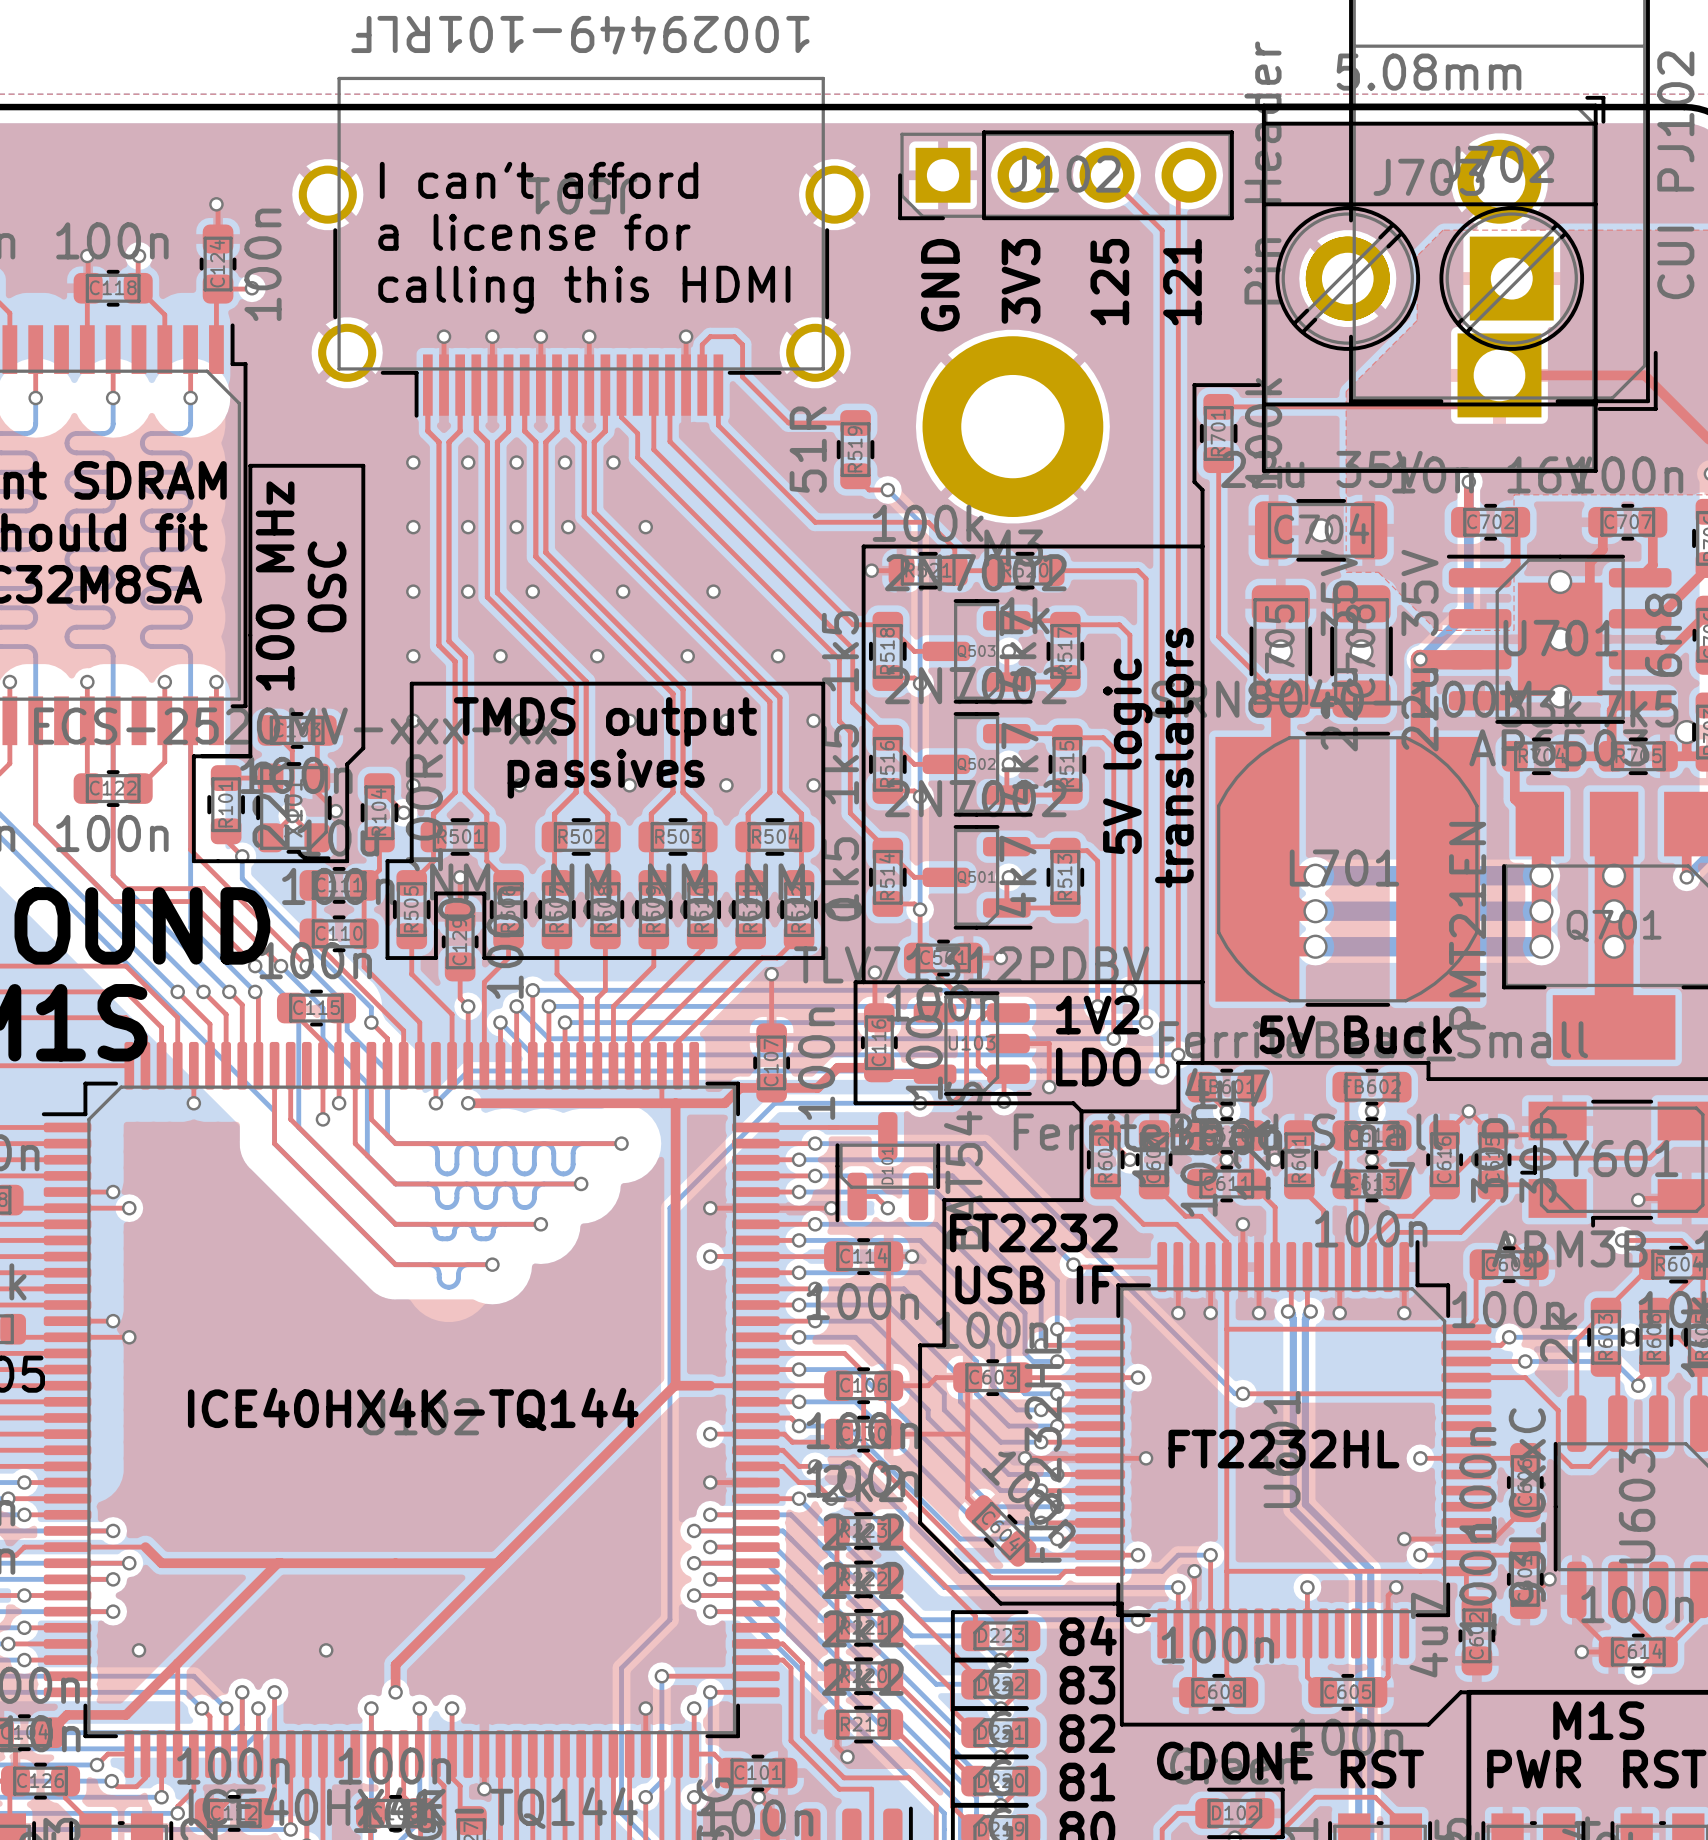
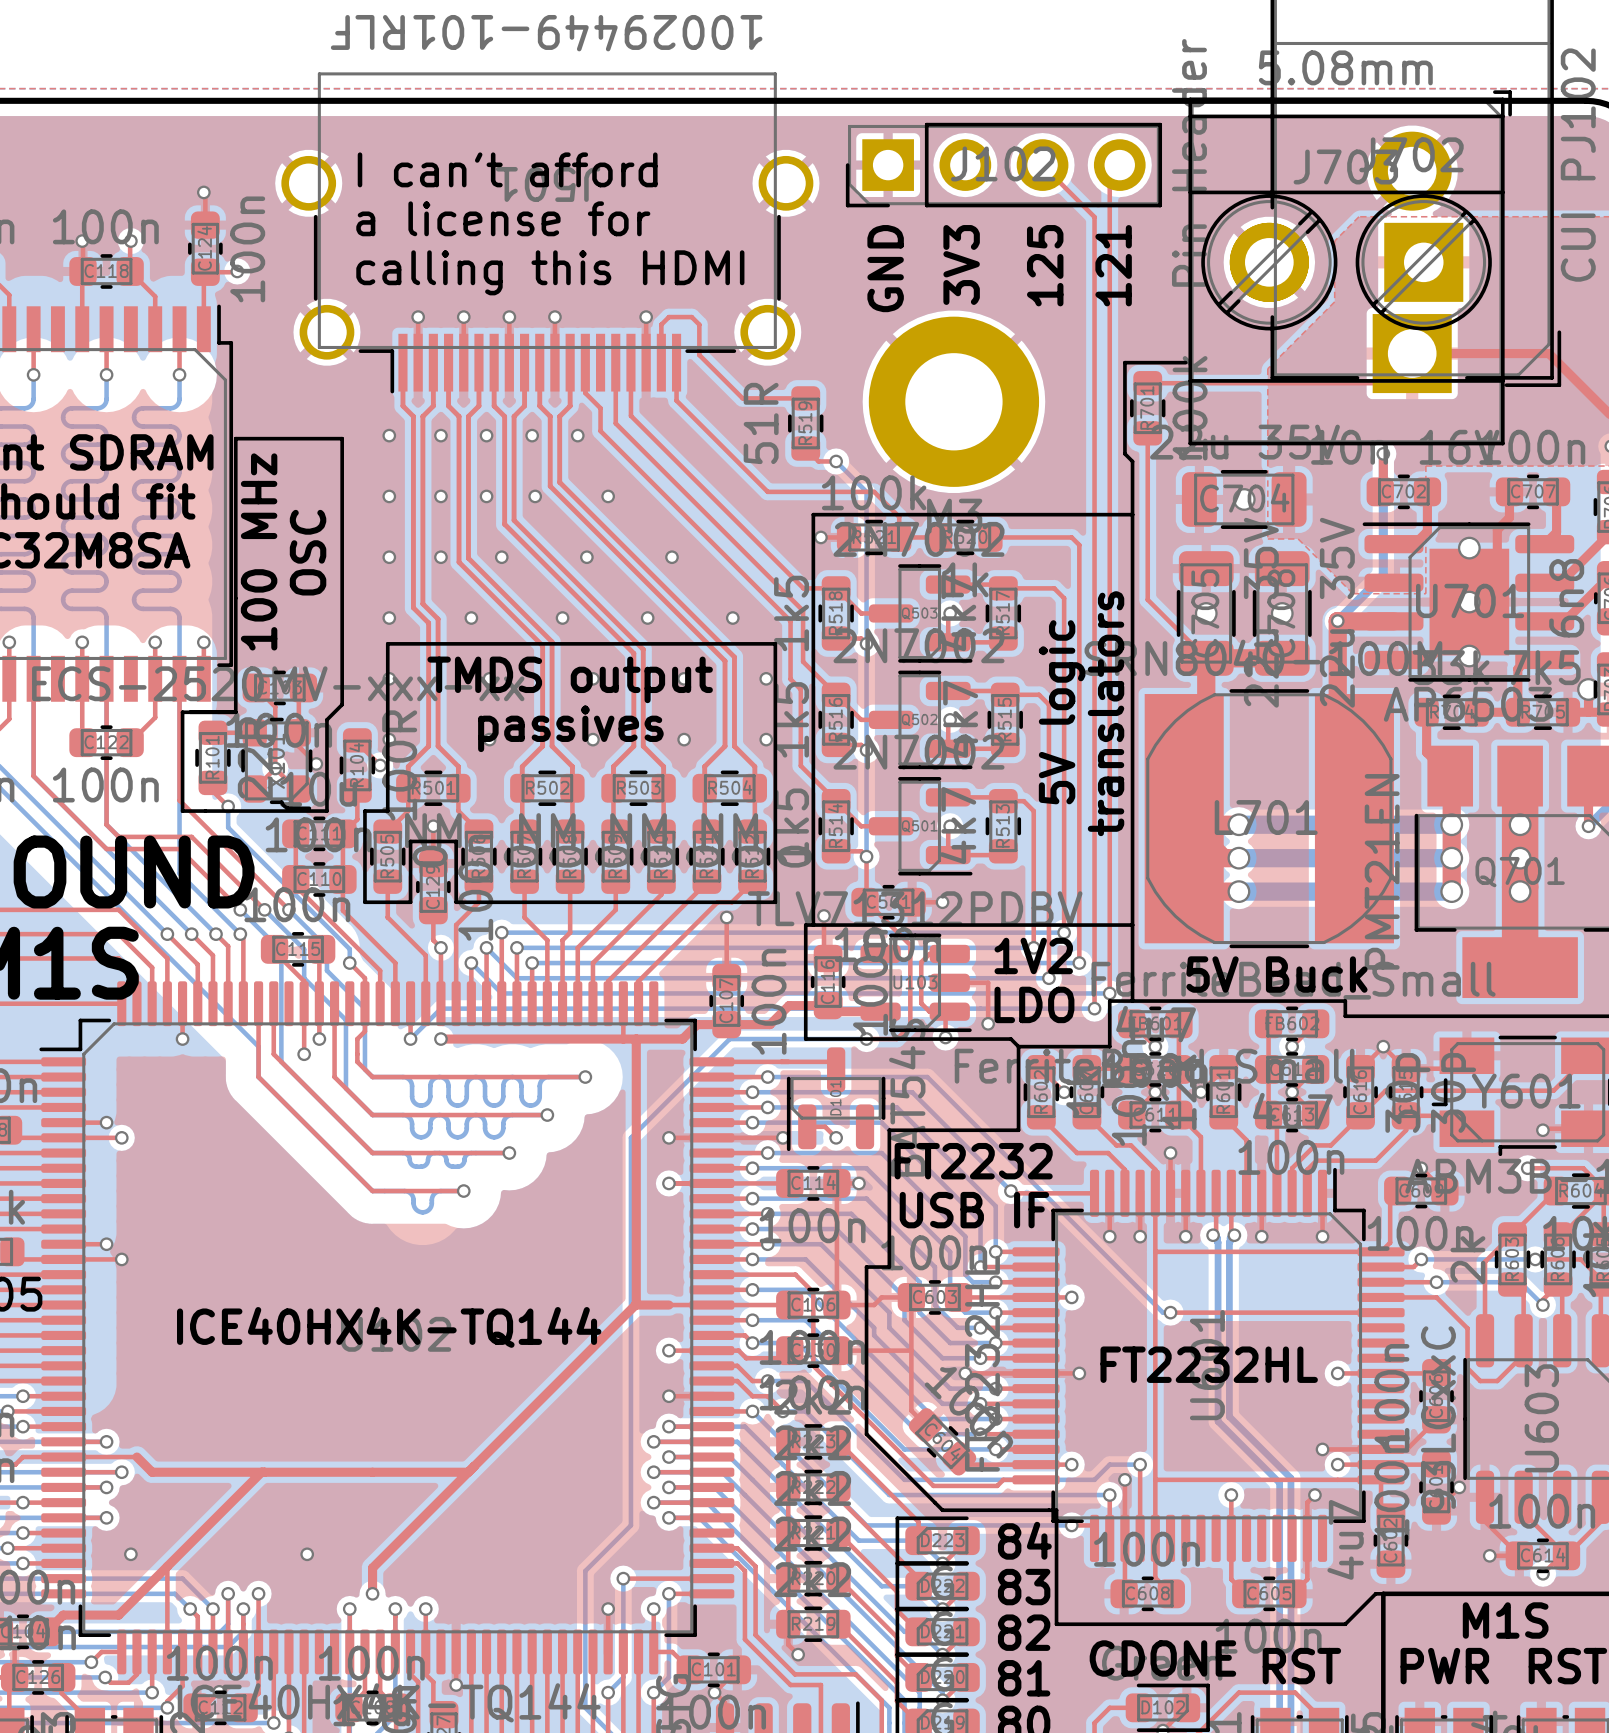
top track: (371, 1065) (371, 1119) (379, 1127) -> (364, 1003) (364, 1031) (357, 1039) (357, 1061)

